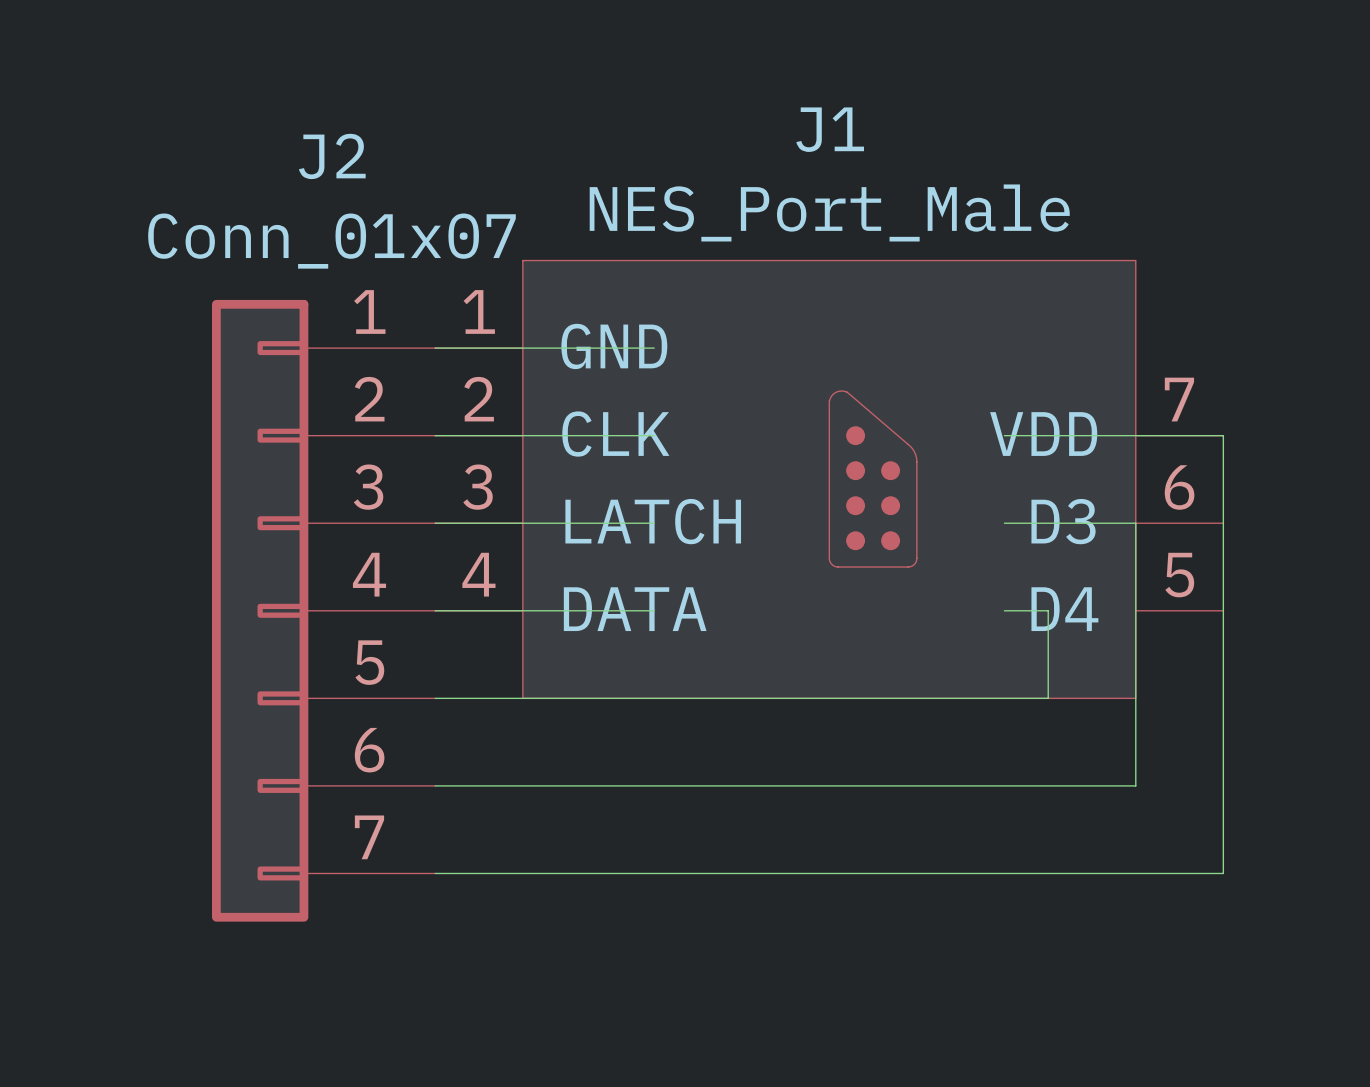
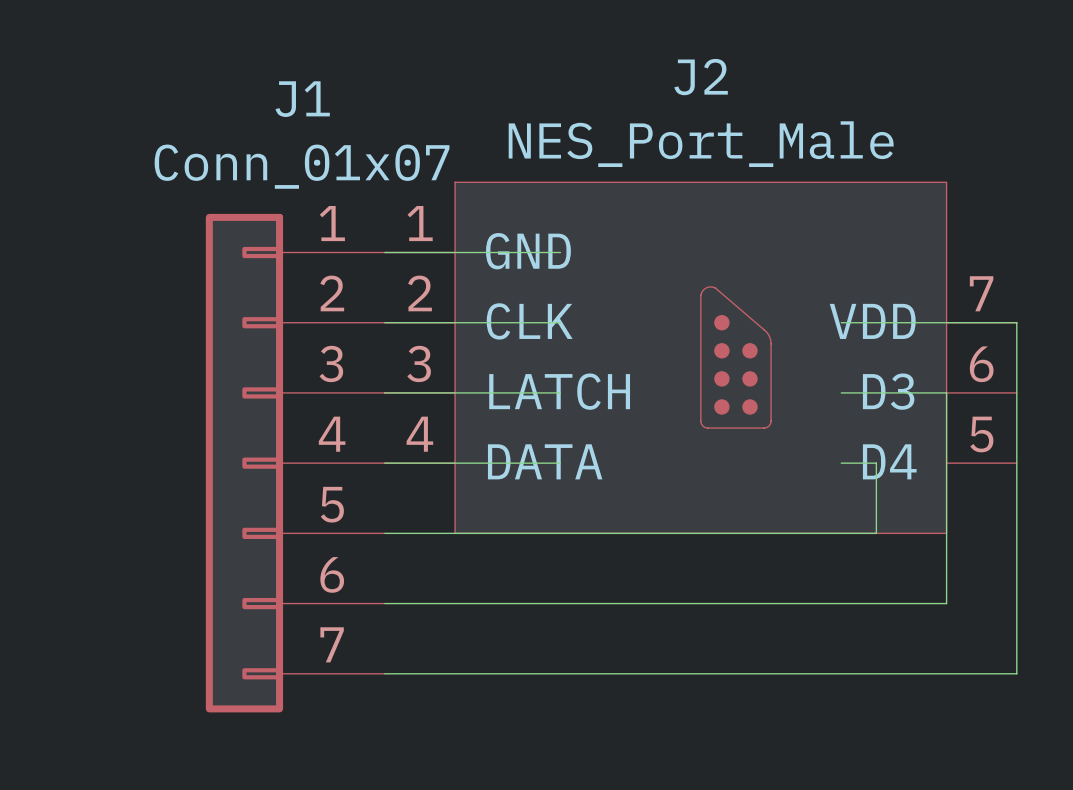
J1 name: J1 (830, 129) -> J2 (701, 77)
J2 name: J2 (332, 156) -> J1 (302, 99)

